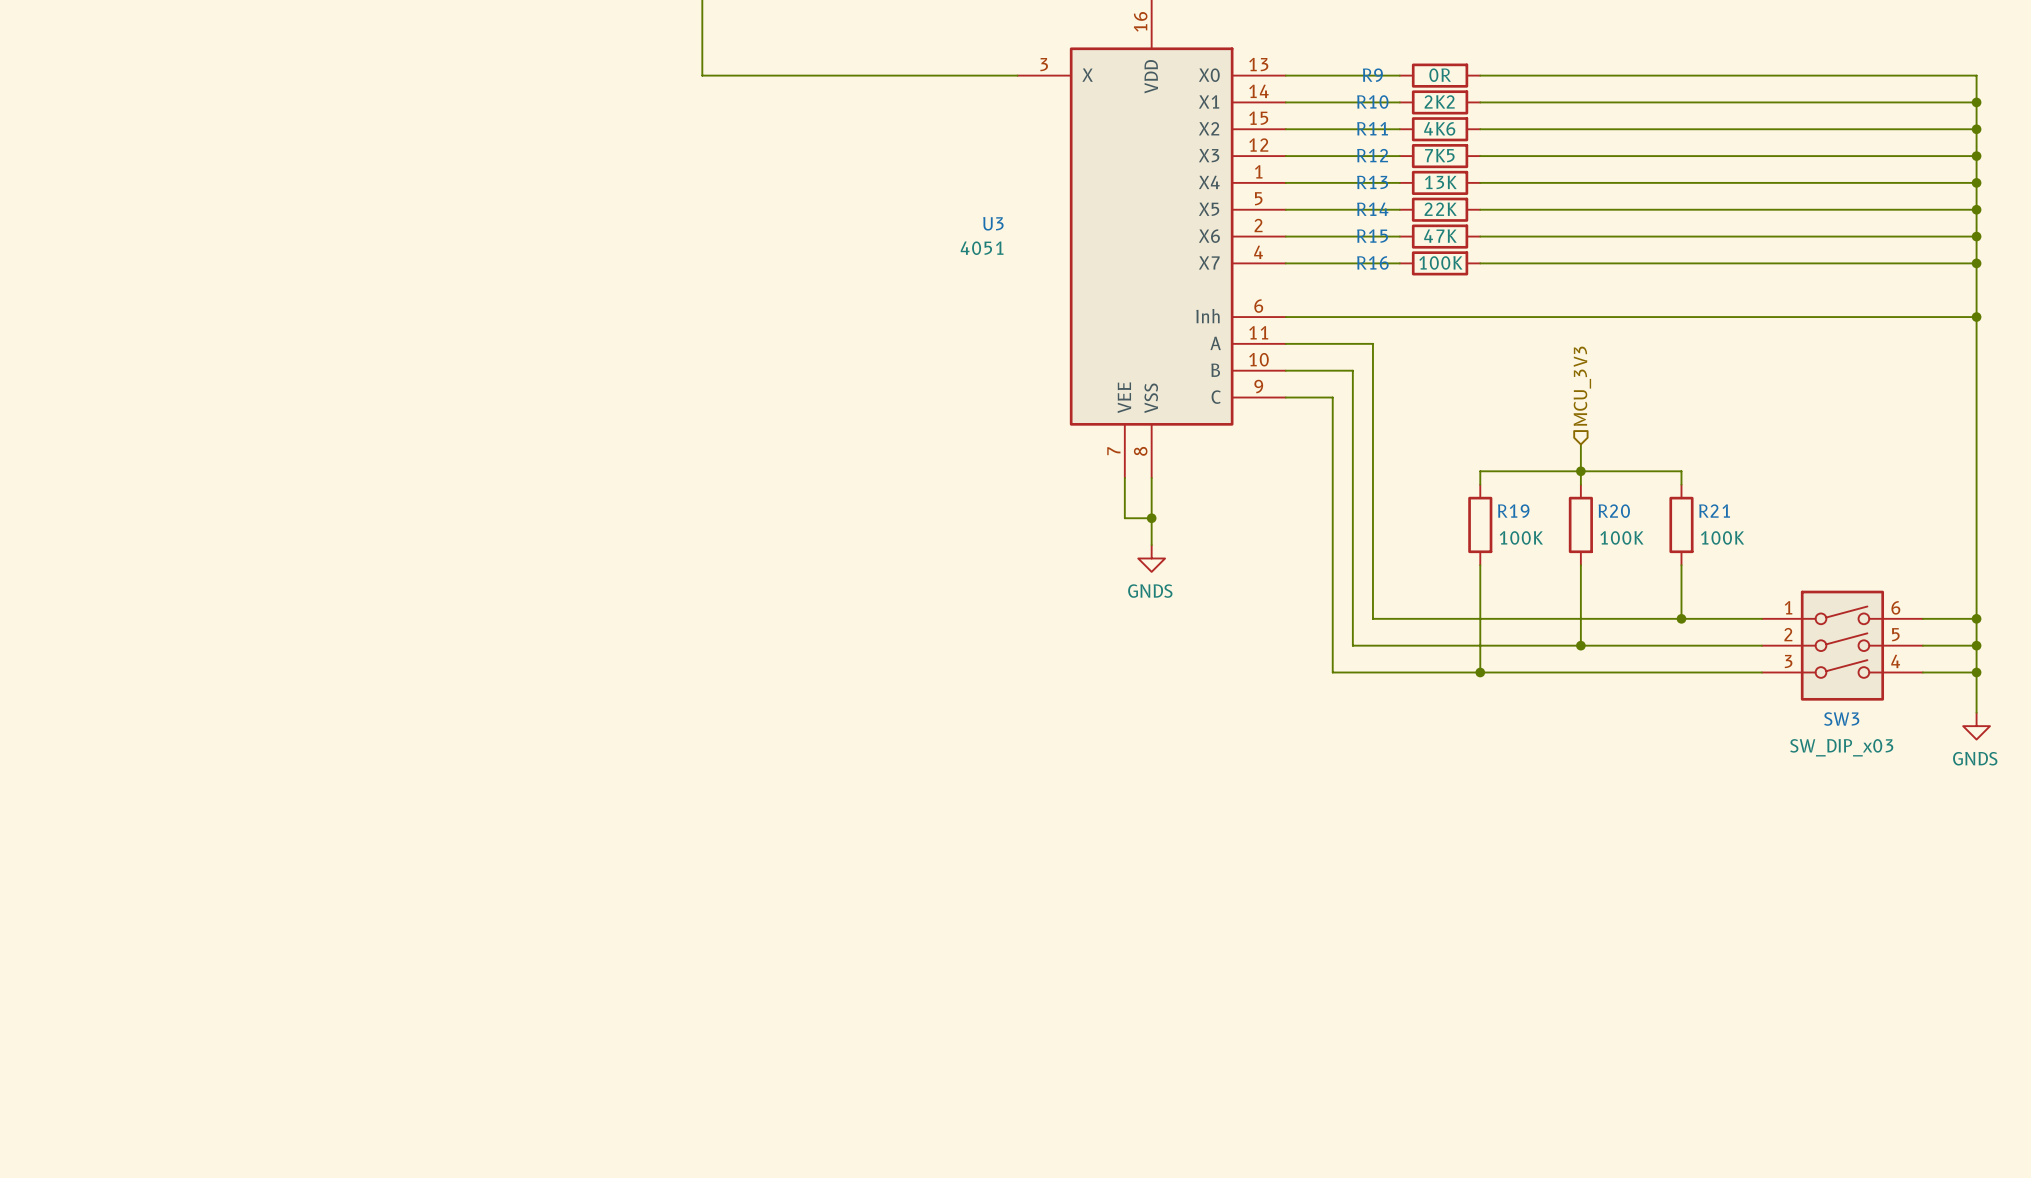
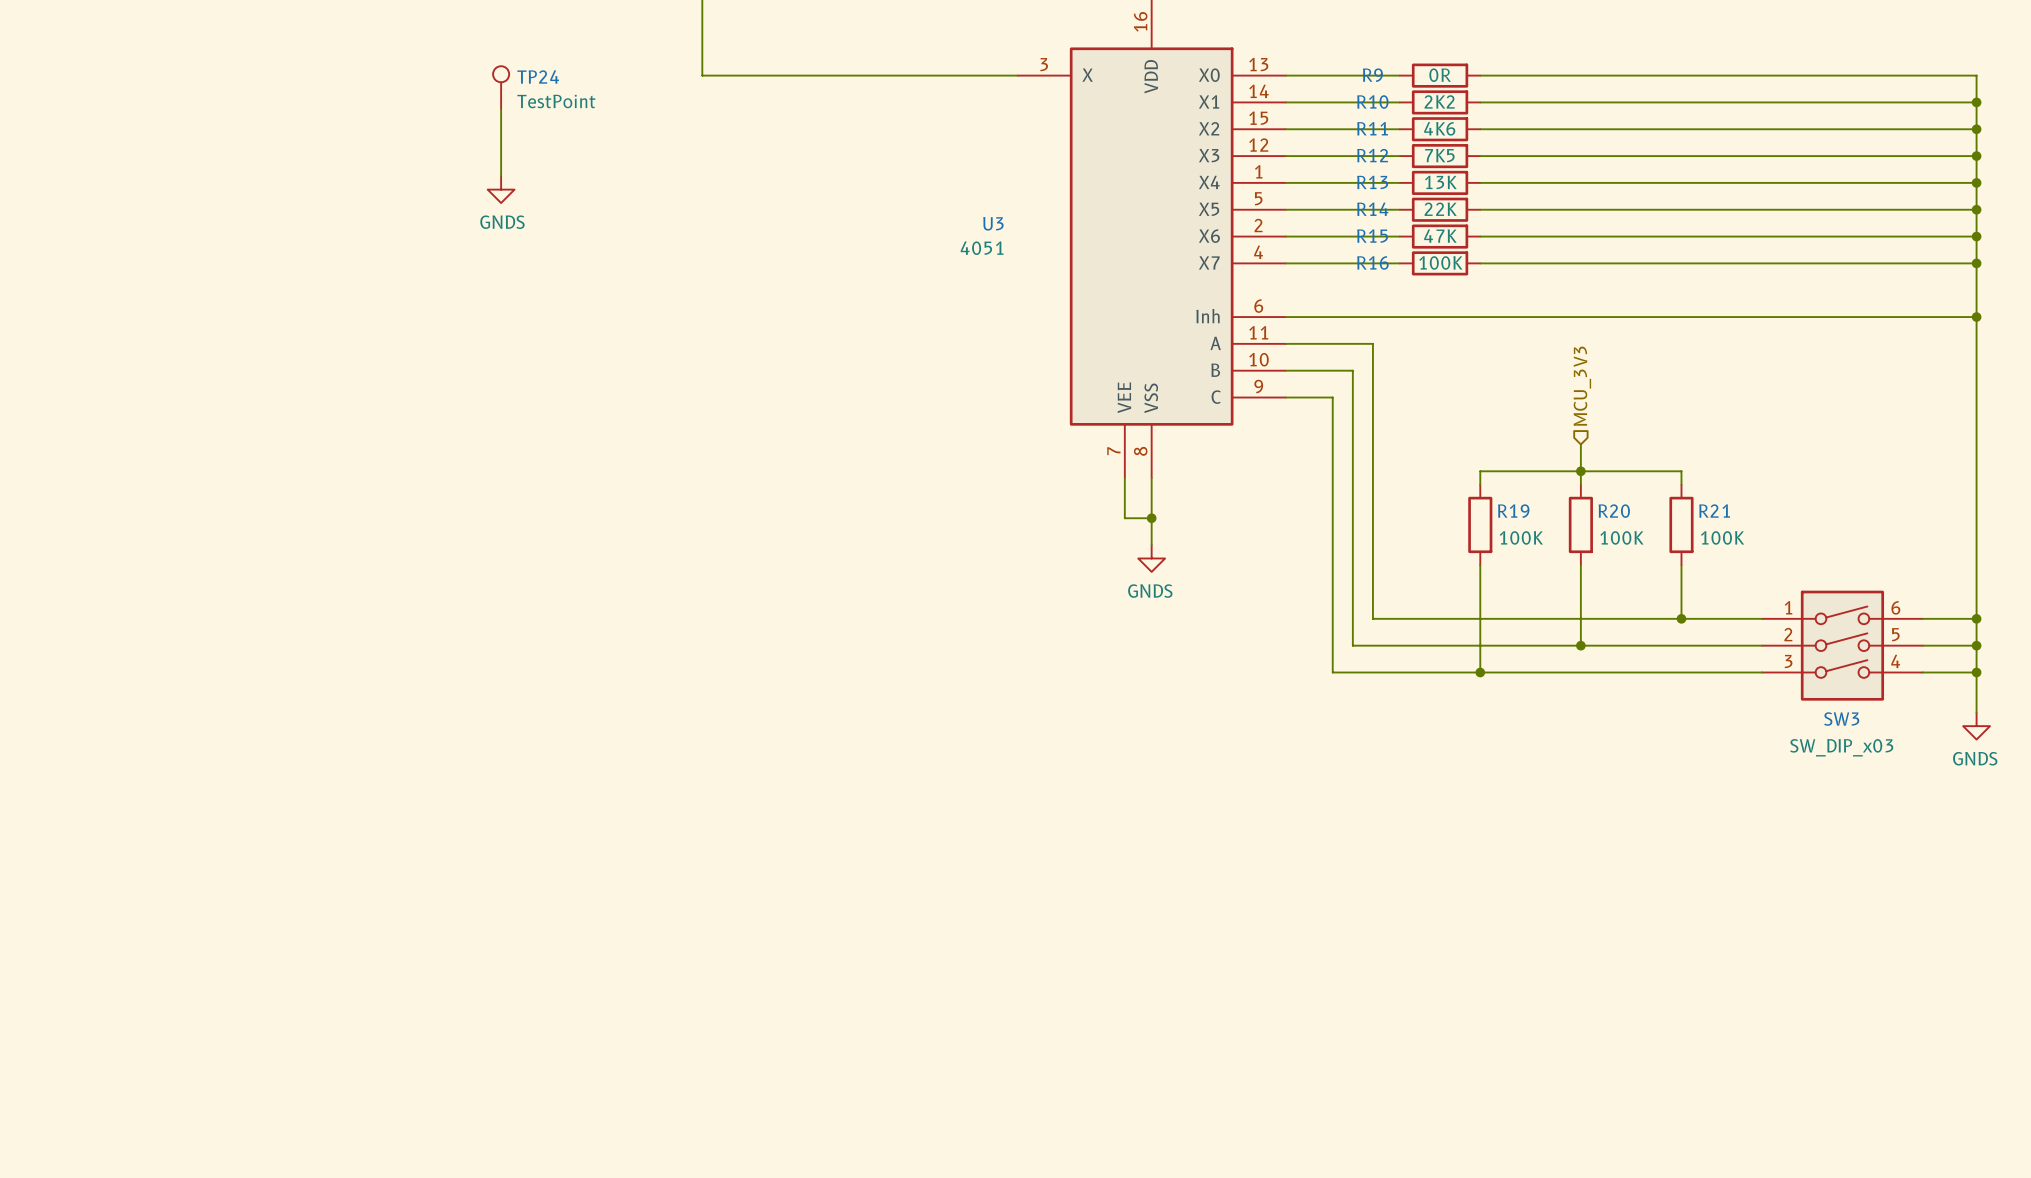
TP24: none -> TestPoint (501, 87)
wire: none -> (501, 109) (501, 176)
power symbol: none -> GNDS (501, 189)

